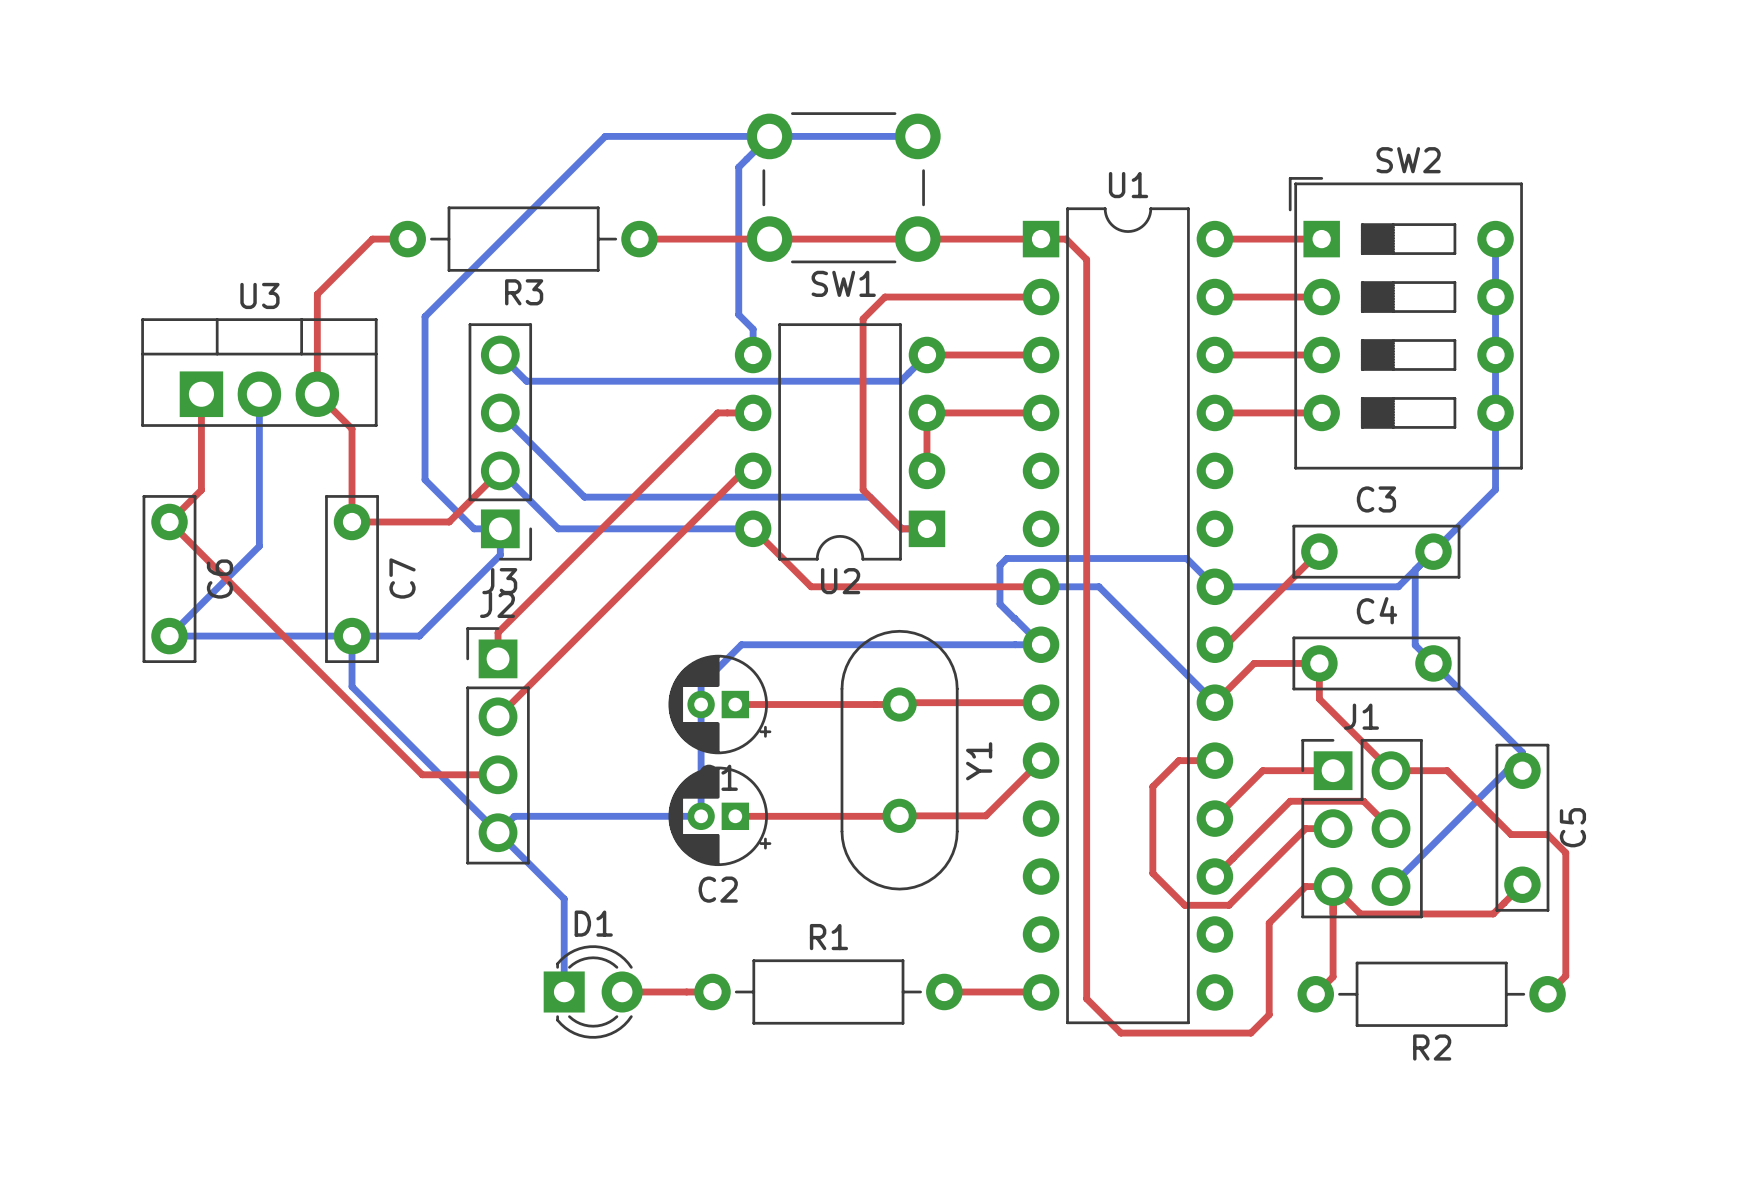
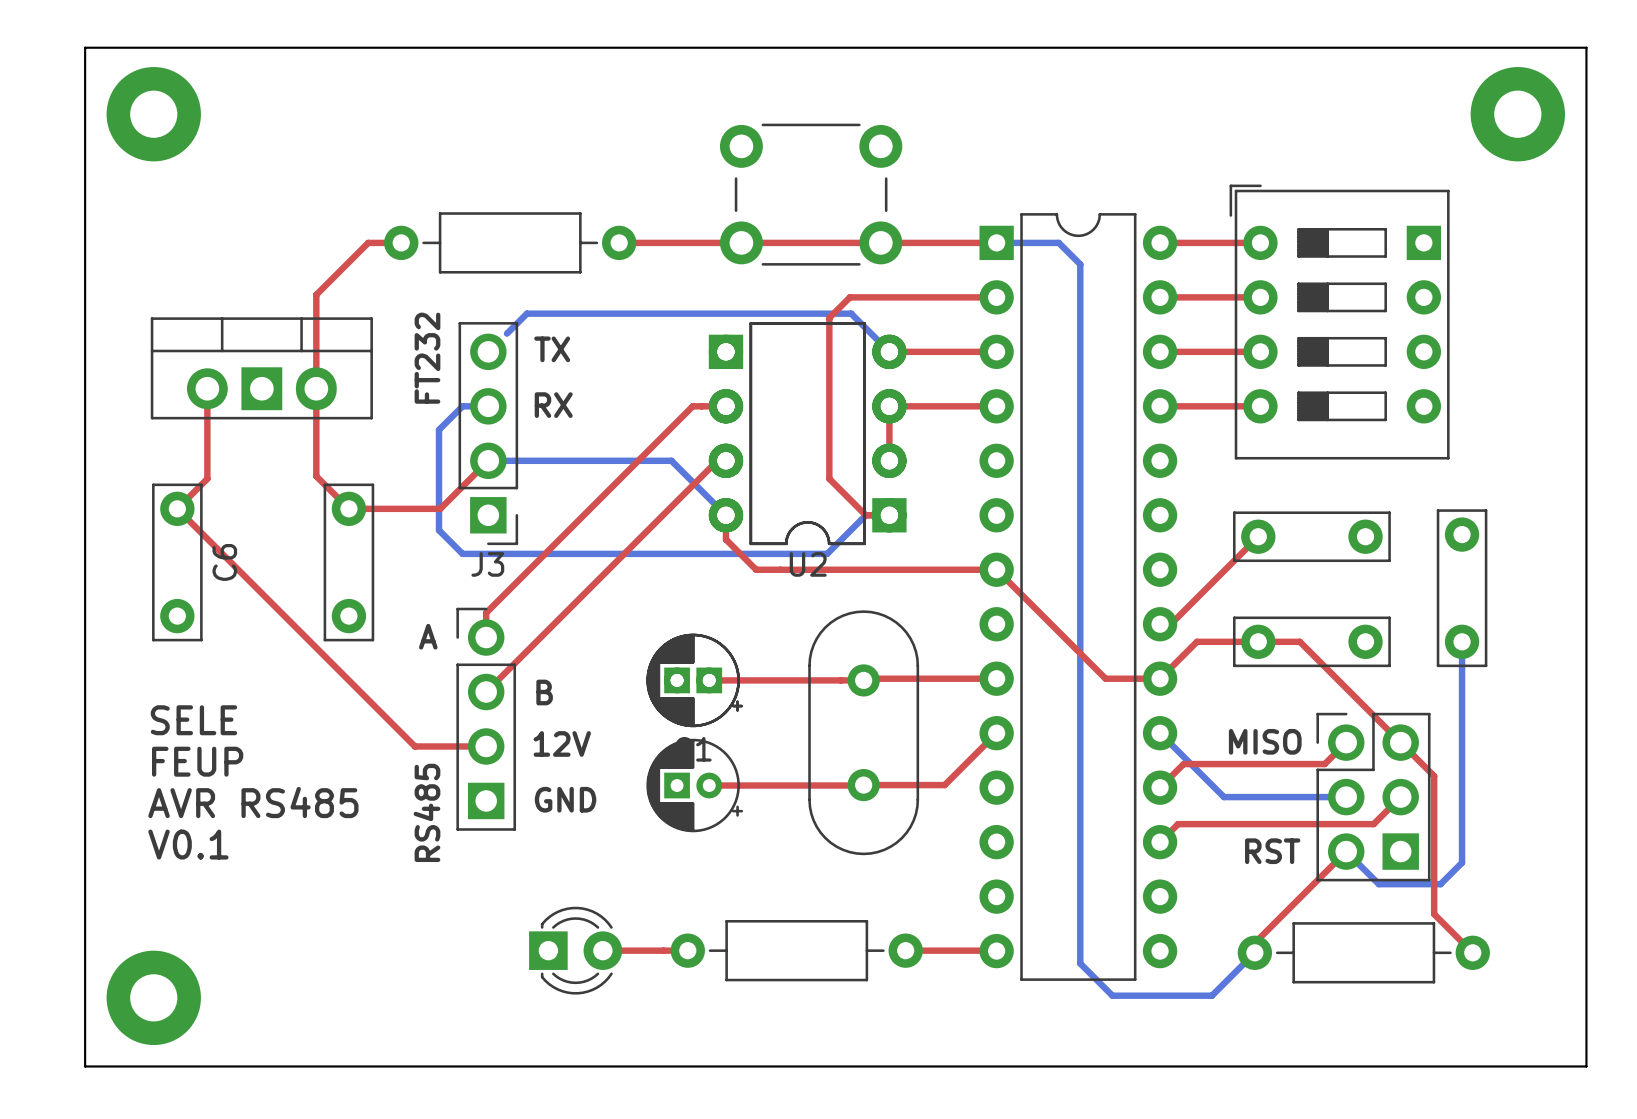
board edge: none -> (85, 47) (85, 1066) (1586, 1066) (1586, 47) (85, 47)
part: none -> (153, 114)
part: none -> (1517, 114)
bottom track: (769, 136) (738, 167) (738, 314) (753, 329) (753, 354) -> none
bottom track: (917, 136) (605, 136) (425, 316) (425, 479) (474, 528) (500, 528) (500, 555) (419, 636) (169, 636) (259, 546) (259, 394) -> none
U1 name: U1 (1128, 185) -> none
bottom track: none -> (996, 242) (1058, 242) (1080, 264) (1080, 963) (1112, 995) (1211, 995) (1254, 952)
top track: (1041, 239) (1066, 239) (1086, 259) (1086, 998) (1120, 1033) (1250, 1033) (1269, 1014) (1269, 923) (1305, 886) (1333, 886) -> none
bottom track: (1495, 239) (1495, 489) (1398, 586) (1214, 586) (1186, 558) (1006, 558) (999, 565) (999, 604) (1014, 618) -> none
SW1 name: SW1 (843, 283) -> none
R3 name: R3 (524, 292) -> none
SW2: (1405, 323) -> none
part: none -> (1339, 322)
text: none -> TX (552, 349)
bottom track: (500, 354) (526, 381) (900, 381) (926, 354) -> (506, 333) (526, 313) (851, 313) (889, 351)
text: none -> FT232 (427, 358)
U3: (259, 372) -> none
part: none -> (261, 368)
top track: (317, 394) (352, 428) (352, 522) -> (316, 388) (316, 476) (348, 508)
text: none -> RX (553, 405)
bottom track: (500, 412) (584, 497) (870, 497) (901, 528) -> (488, 406) (462, 406) (439, 429) (439, 530) (462, 553) (827, 553) (865, 515)
part: none -> (807, 433)
bottom track: (500, 470) (558, 528) (753, 528) -> (488, 460) (671, 460) (725, 515)
C3 name: C3 (1376, 499) -> none
top track: (753, 528) (811, 586) -> (725, 515) (725, 539) (756, 569) (780, 569)
bottom track: (1415, 569) (1415, 645) (1522, 752) (1522, 770) (1506, 770) (1391, 886) -> none
C7 name: C7 (402, 578) -> none
bottom track: (1041, 586) (1099, 586) (1214, 702) -> none
top track: none -> (996, 569) (1105, 678) (1160, 678)
part: none -> (1462, 588)
C4 name: C4 (1376, 610) -> none
bottom track: (1014, 618) (1041, 644) (741, 644) (701, 685) (701, 816) (514, 816) (498, 832) -> none
bottom track: (352, 636) (352, 686) (564, 898) (564, 991) -> none
text: none -> A (428, 636)
top track: (1319, 663) (1319, 699) (1391, 770) (1447, 770) (1511, 834) (1547, 834) (1565, 852) (1565, 976) (1547, 994) -> (1258, 641) (1299, 641) (1434, 776) (1434, 914) (1472, 952)
bottom track: none -> (1462, 641) (1462, 862) (1440, 884) (1378, 884) (1346, 851)
part: none -> (694, 680)
text: none -> B (544, 692)
J2: (498, 745) -> none
part: none -> (486, 719)
text: none -> SELE (193, 720)
bottom track: none -> (1160, 733) (1223, 797) (1346, 797)
top track: (1214, 760) (1178, 760) (1152, 786) (1152, 873) (1184, 905) (1229, 905) (1305, 828) (1333, 828) -> none
Y1 name: Y1 (979, 761) -> none
text: none -> MISO (1265, 741)
top track: (1333, 770) (1262, 770) (1240, 793) -> (1346, 742) (1324, 764) (1183, 764)
text: none -> 12V (562, 743)
text: none -> FEUP (197, 761)
C2: (719, 816) -> none
part: none -> (694, 785)
C5: (1522, 827) -> none
J1: (1362, 828) -> none
top track: (1391, 828) (1363, 801) (1290, 801) (1234, 857) -> (1400, 797) (1373, 824) (1178, 824)
part: none -> (1373, 797)
text: none -> GND (565, 799)
text: none -> AVR RS485 (253, 802)
text: none -> RS485 (426, 812)
text: none -> V0.1 (188, 844)
top track: (1522, 884) (1493, 913) (1360, 913) (1333, 886) -> none
top track: (1333, 886) (1333, 976) (1315, 994) -> (1346, 851) (1254, 942) (1254, 952)
text: none -> RST (1272, 851)
D1 name: D1 (593, 923) -> none
R1 name: R1 (828, 937) -> none
part: none -> (153, 997)
R2 name: R2 (1432, 1047) -> none

